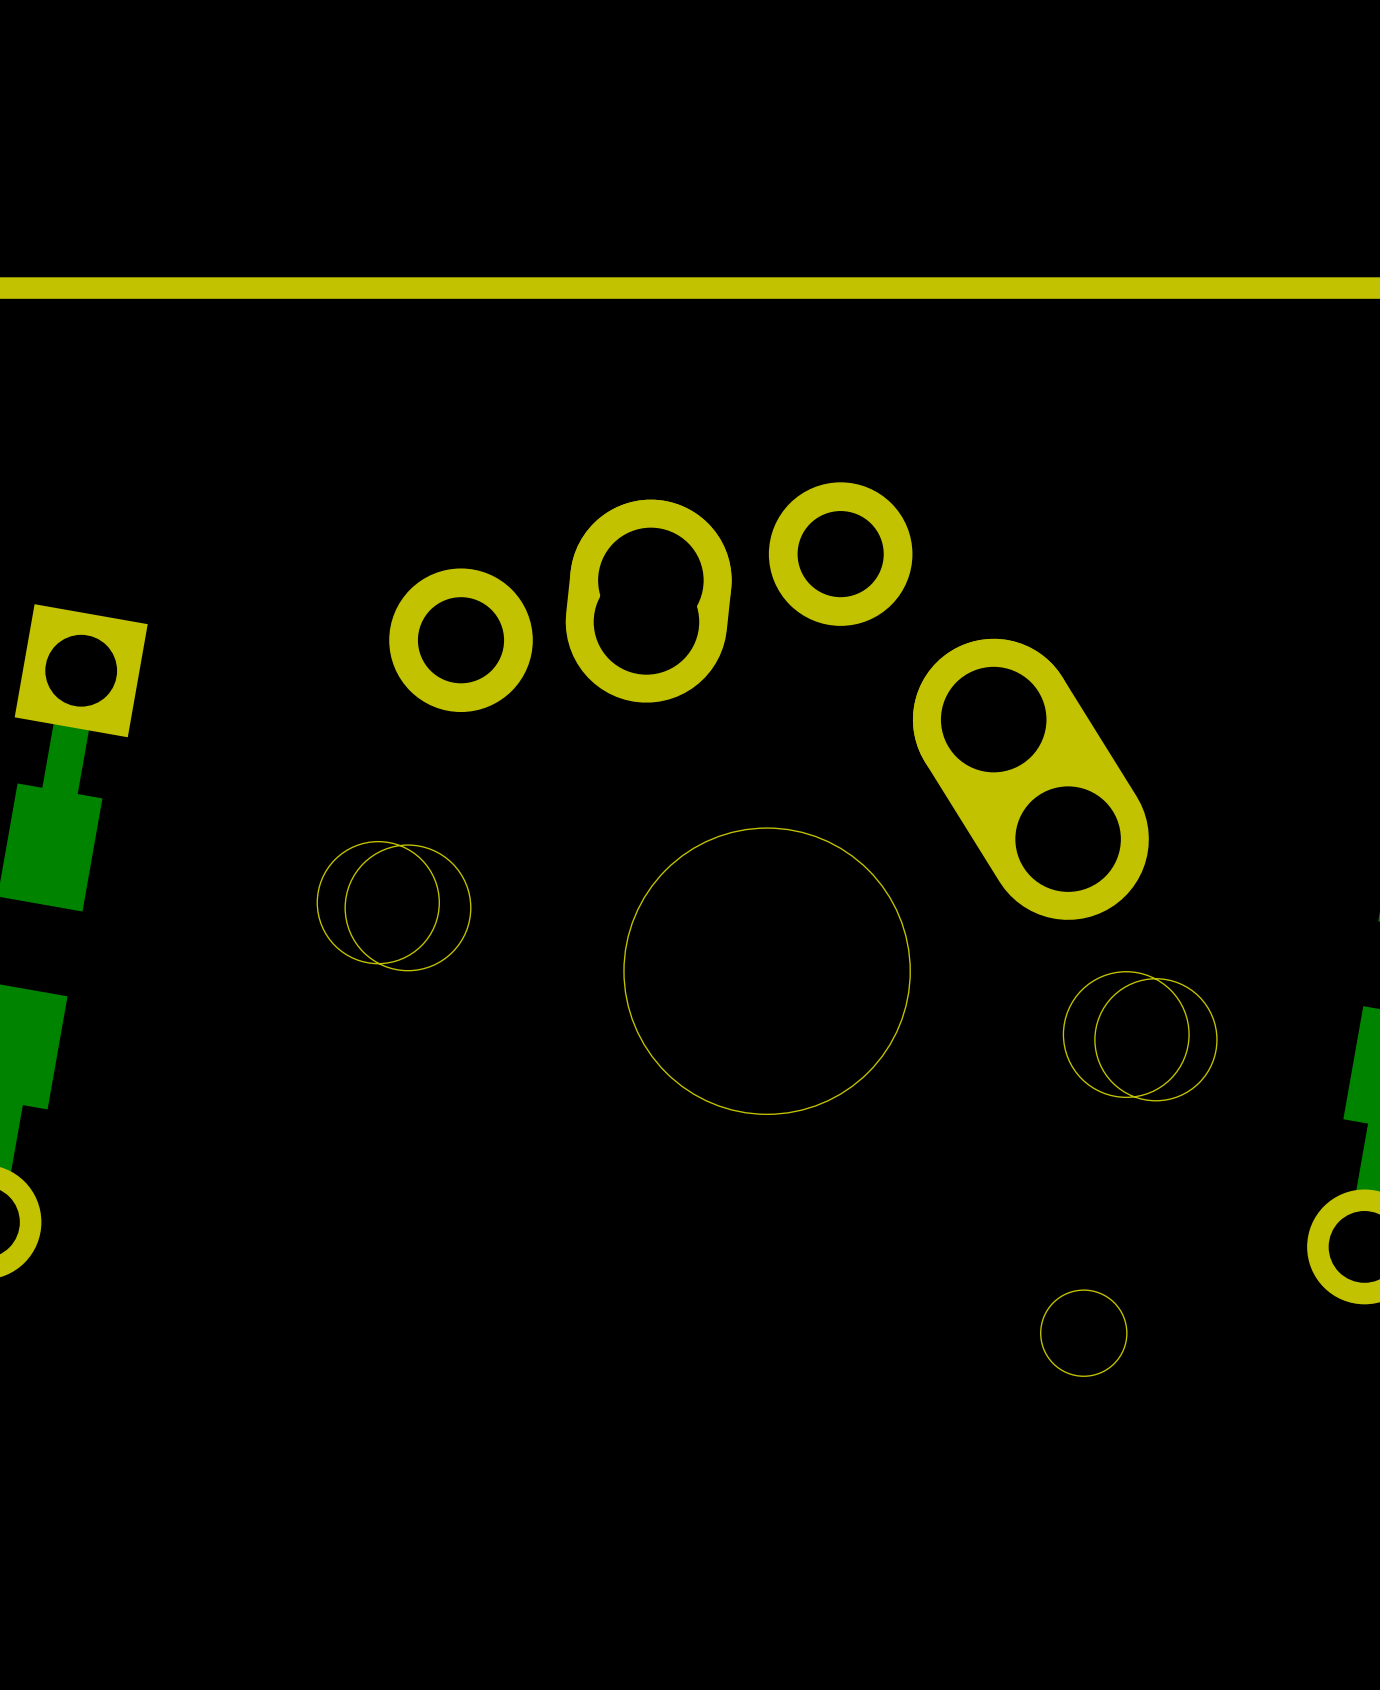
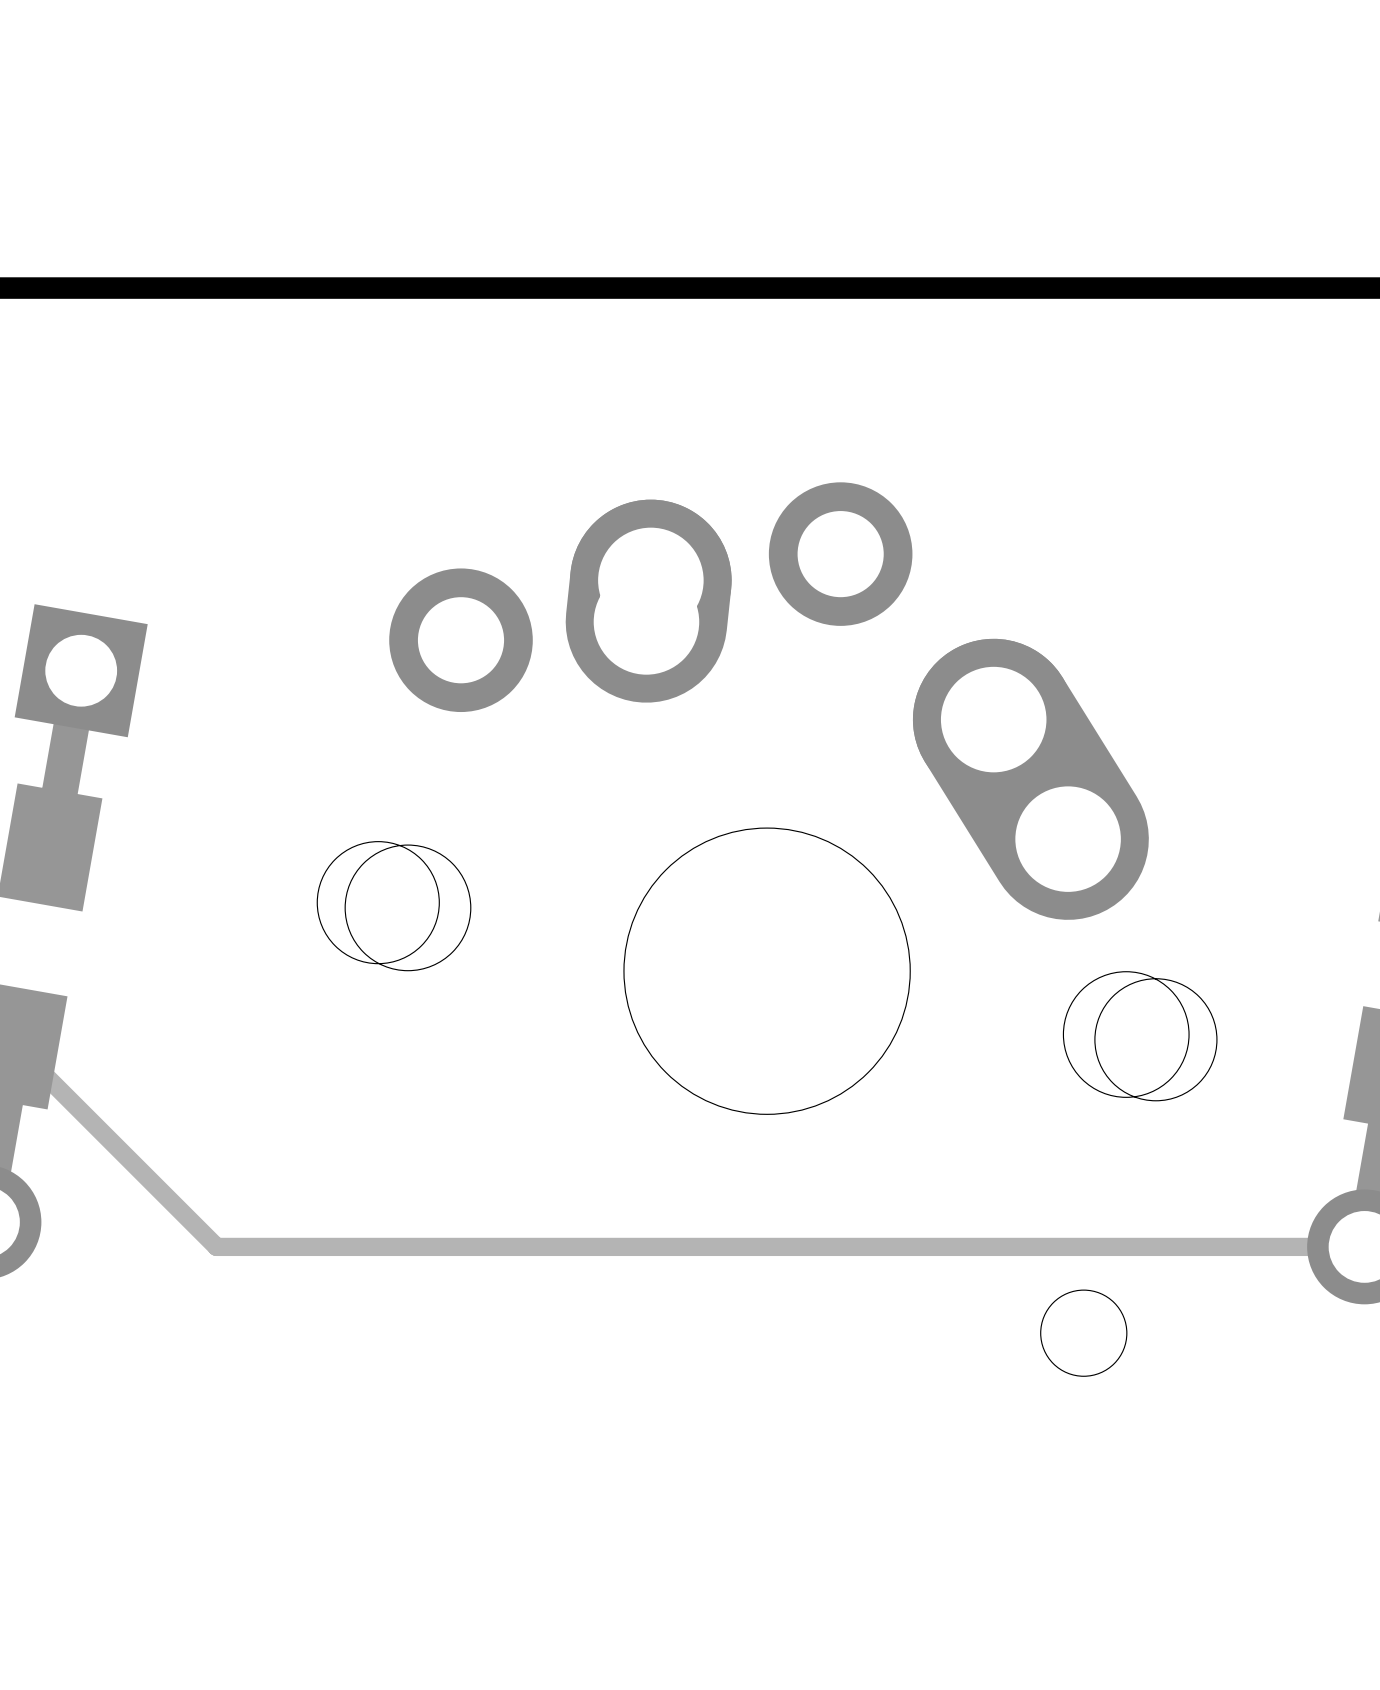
track: none -> (15, 1045) (216, 1246) (1364, 1246)

